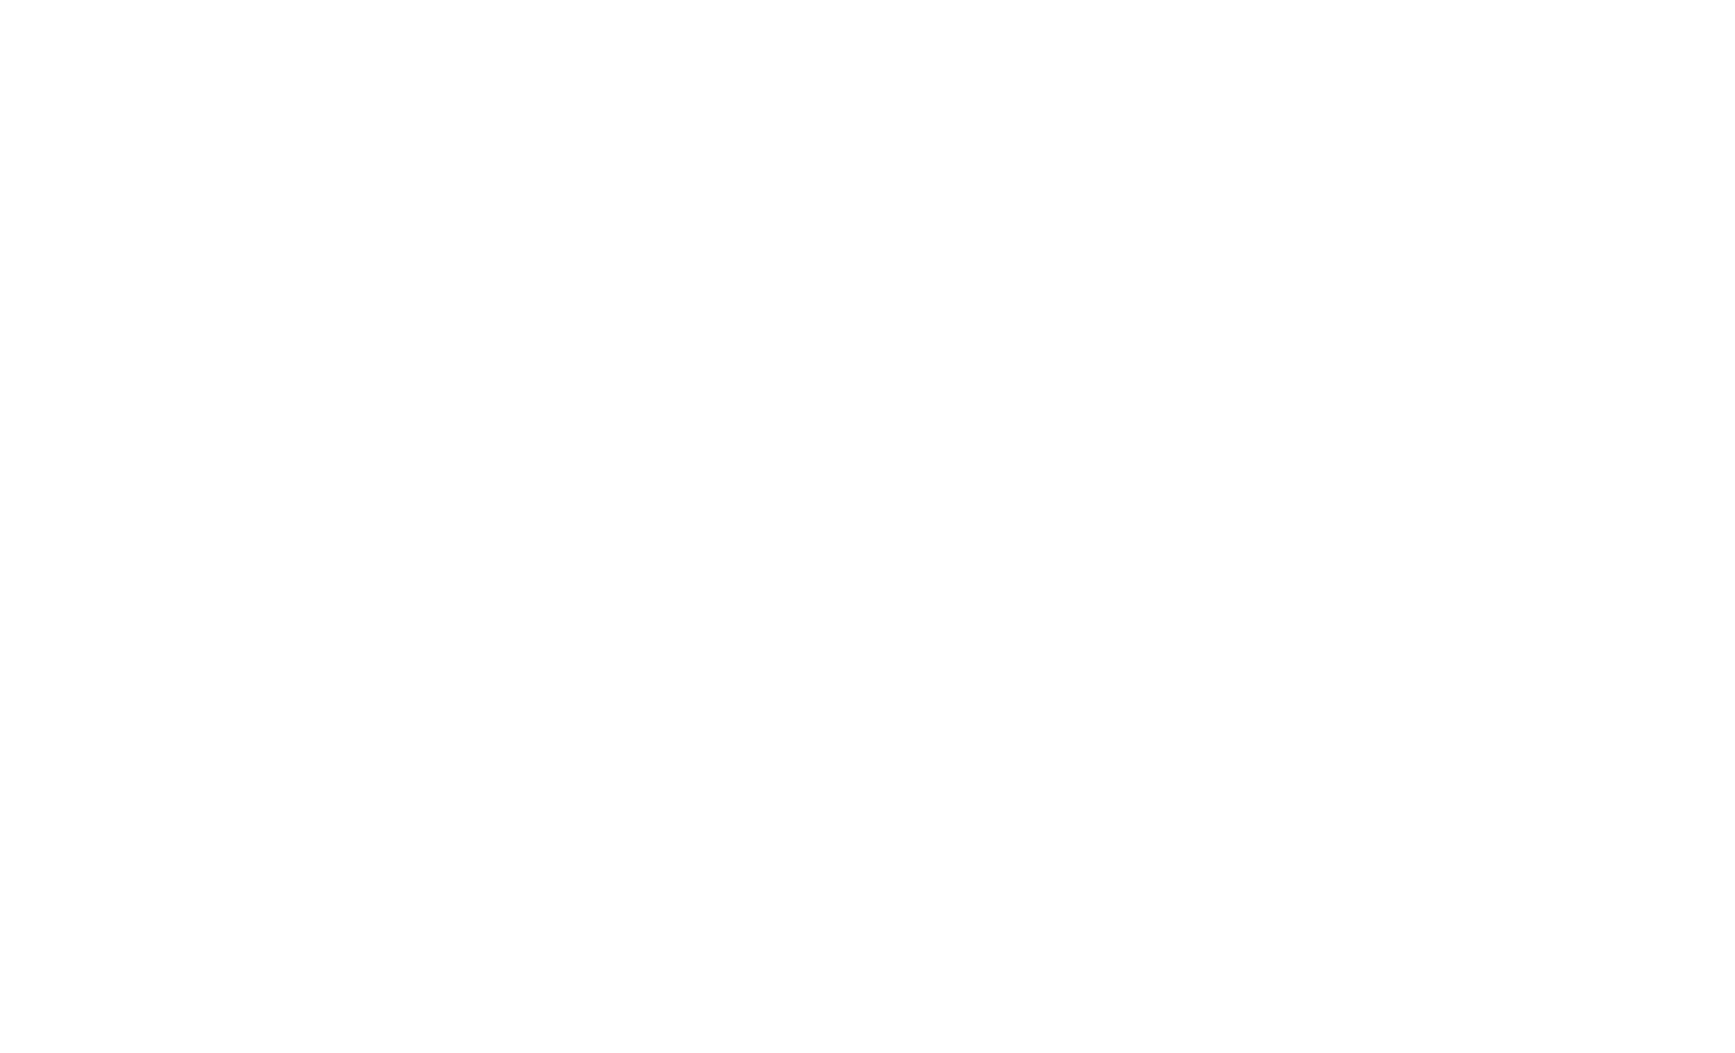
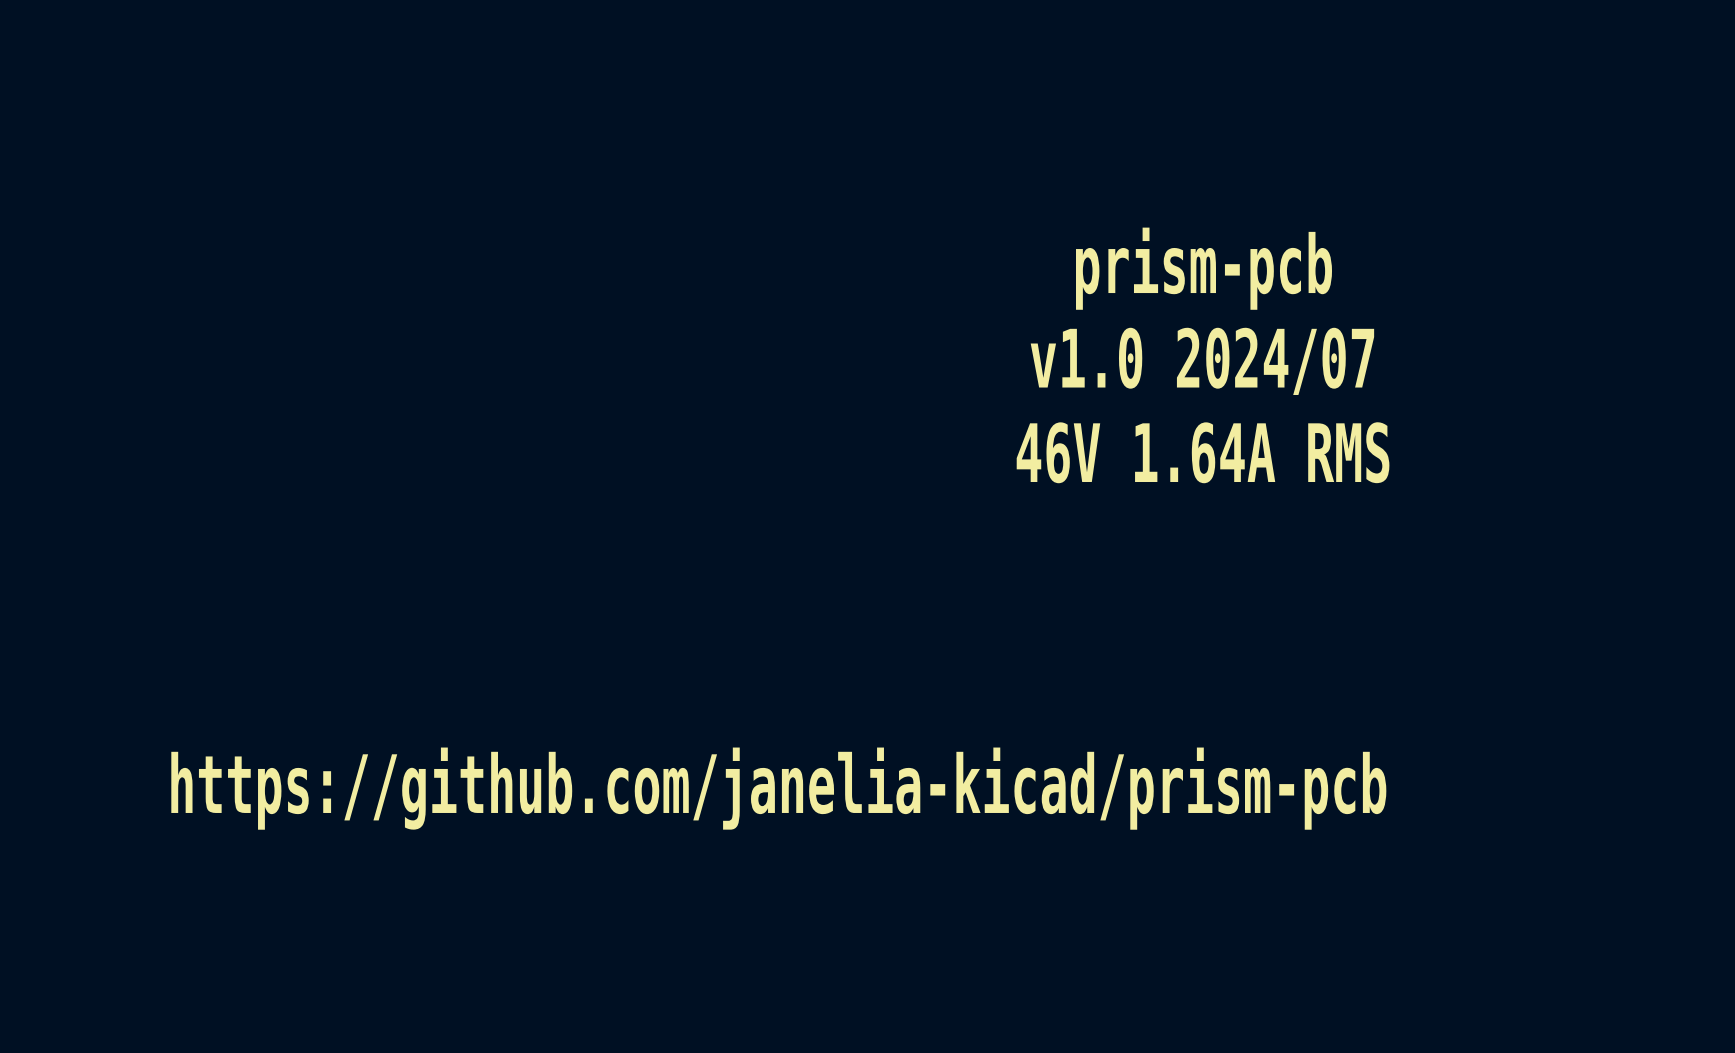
text: none -> prism-pcb (1204, 268)
text: none -> v1.0 2024/07 (1202, 361)
text: none -> 46V 1.64A RMS (1203, 452)
text: none -> https://github.com/janelia-kicad/prism-pcb (778, 788)

